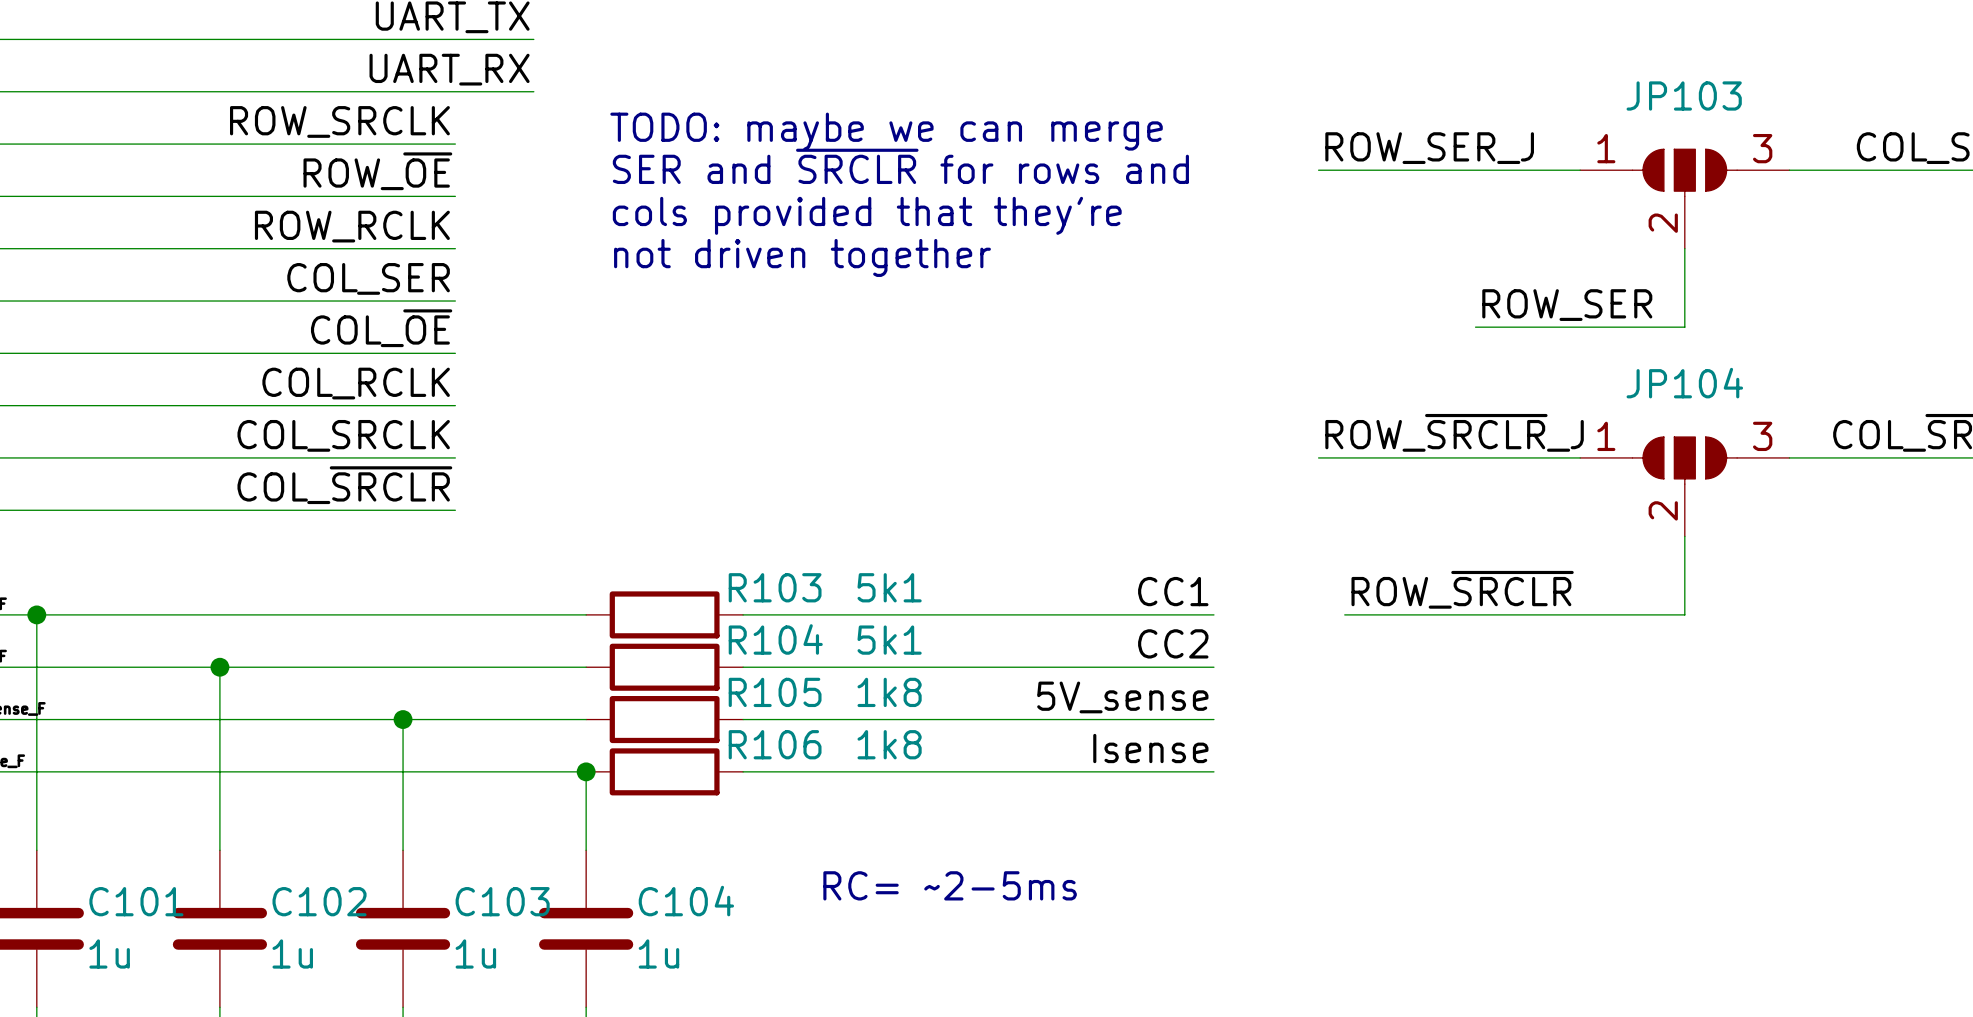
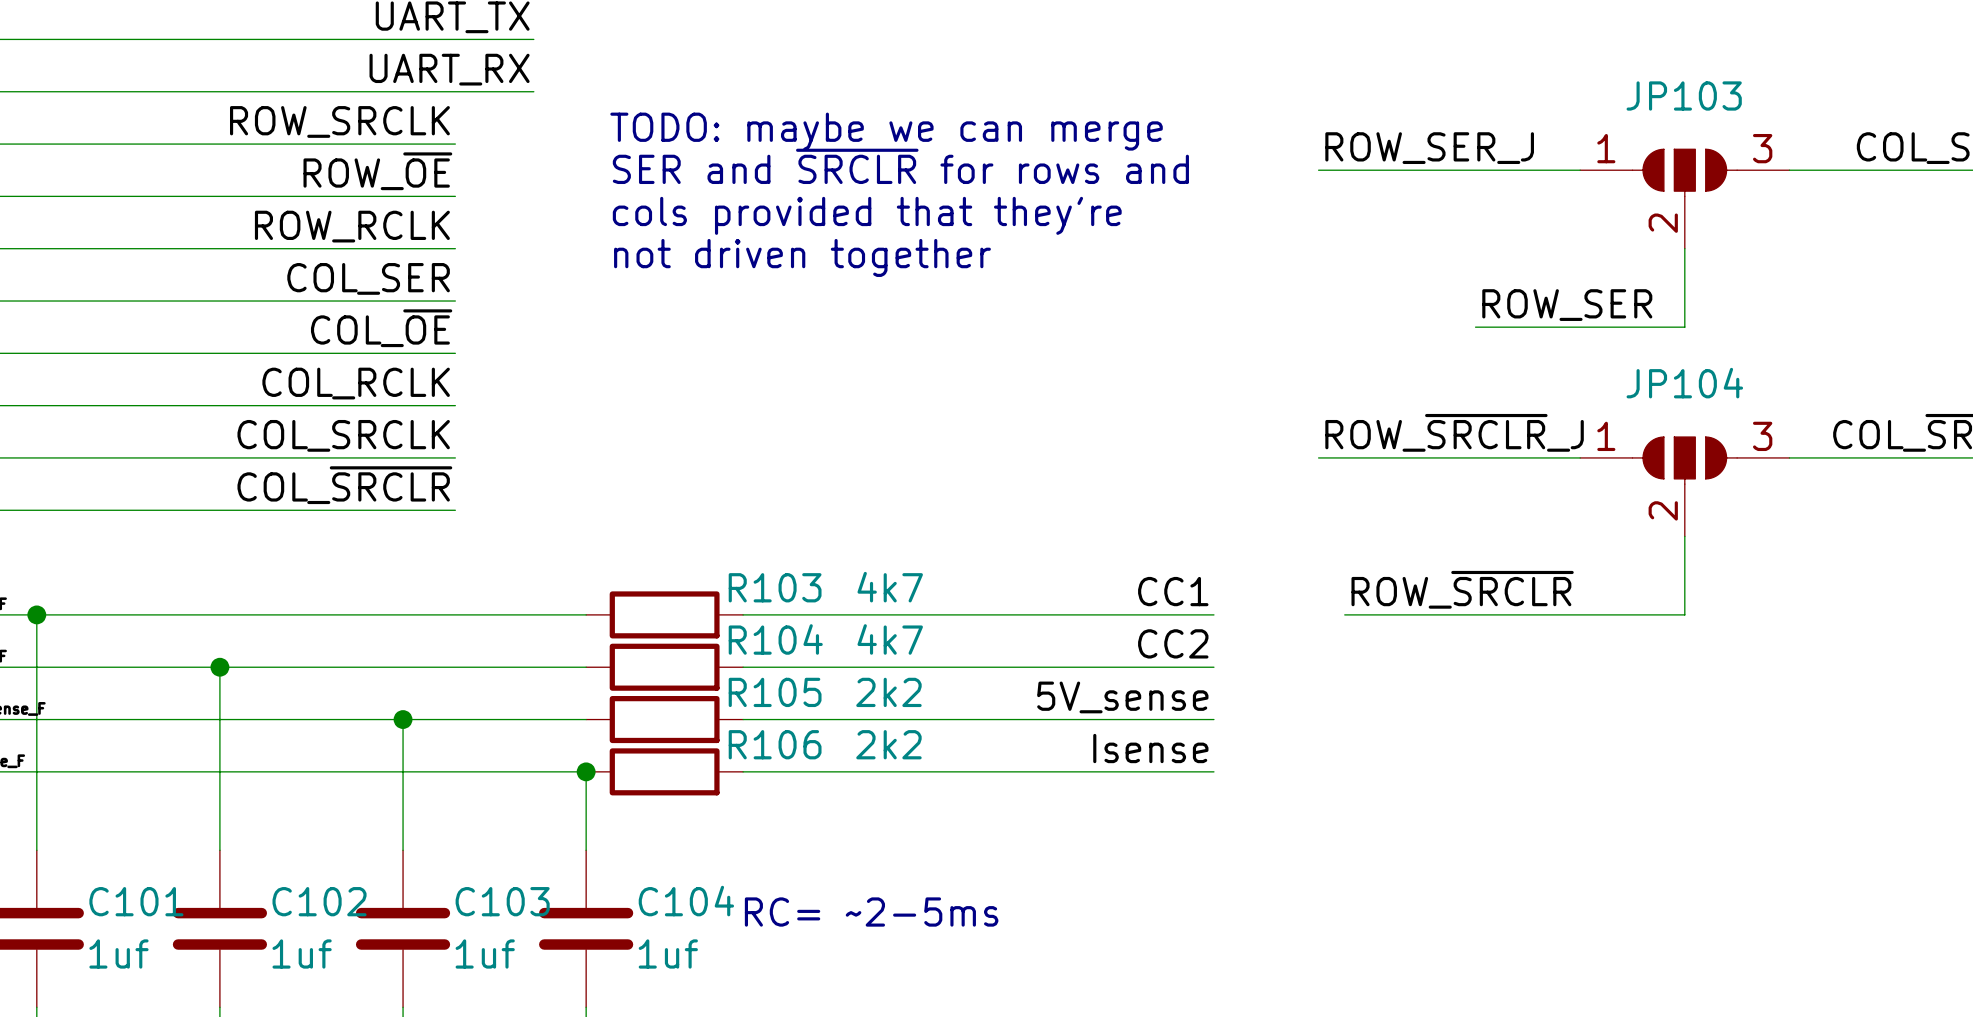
R103 value: 5k1 (889, 587) -> 4k7 (890, 587)
R104 value: 5k1 (889, 640) -> 4k7 (890, 639)
R105 value: 1k8 (889, 692) -> 2k2 (888, 692)
R106 value: 1k8 (889, 744) -> 2k2 (888, 744)
text position: RC= ~2-5ms (950, 885) -> RC= ~2-5ms (871, 912)
C101 value: 1u (109, 953) -> 1uf (118, 953)
C102 value: 1u (292, 953) -> 1uf (302, 953)
C103 value: 1u (475, 953) -> 1uf (485, 953)
C104 value: 1u (658, 953) -> 1uf (668, 953)

